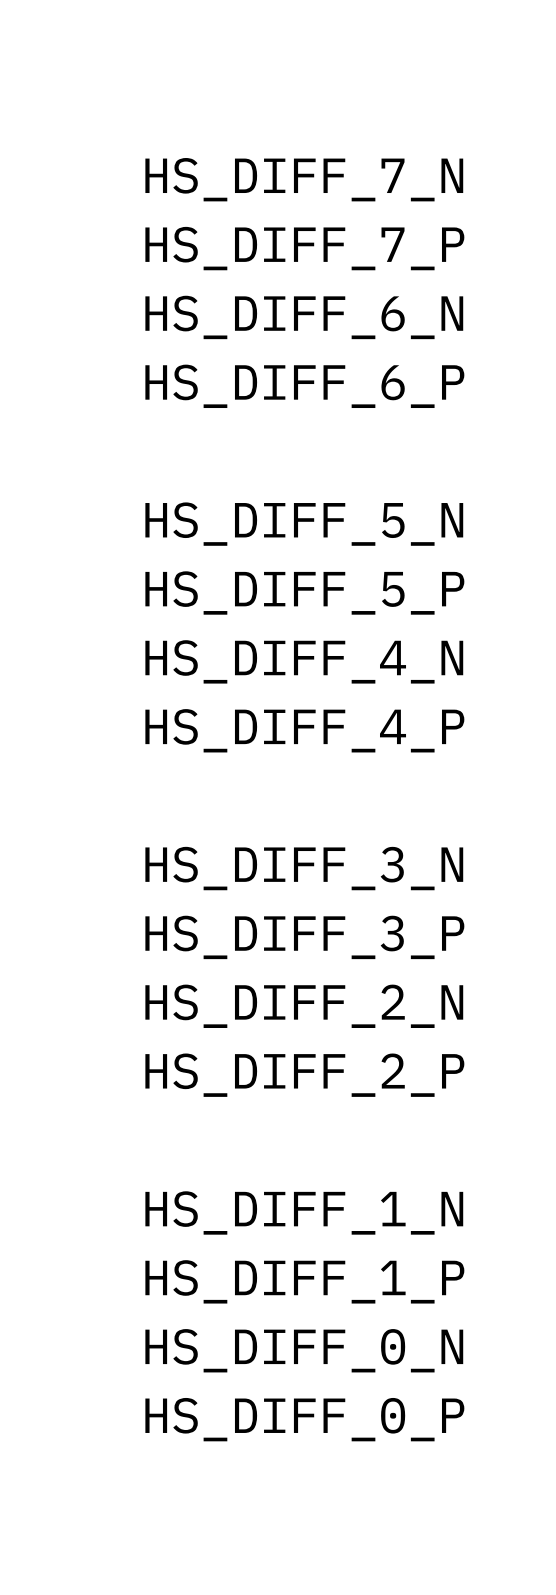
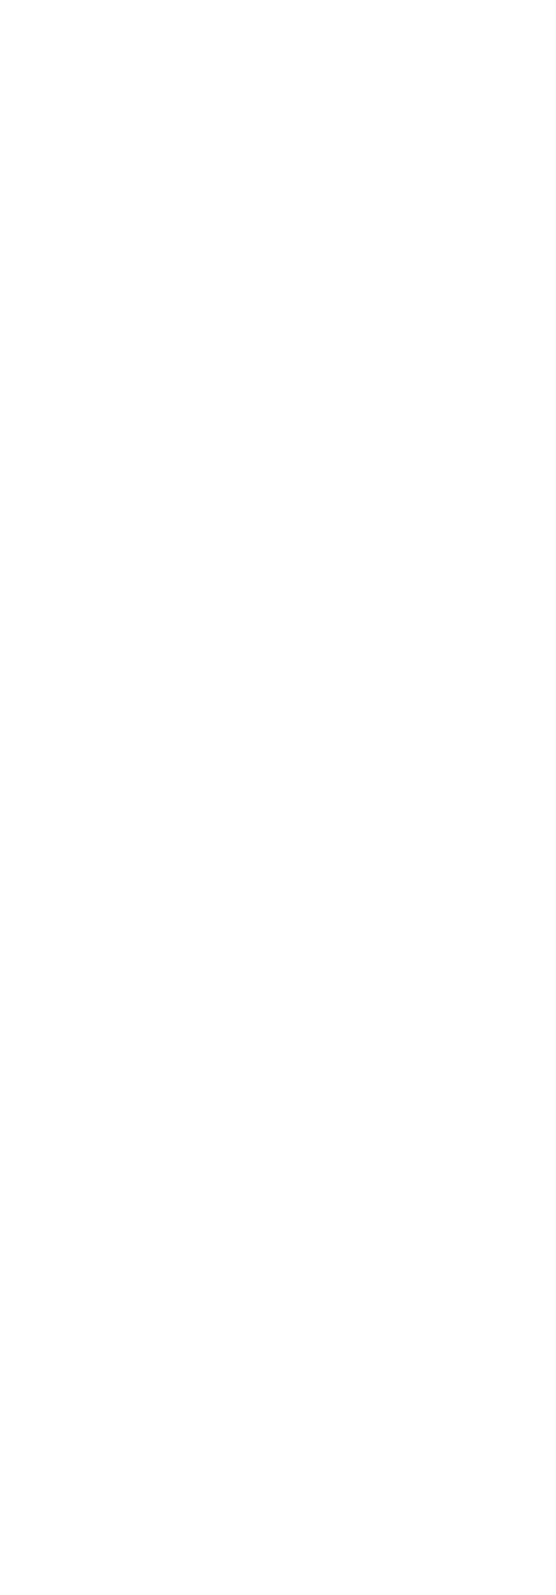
label: HS_DIFF_7_N (304, 179) -> none
label: HS_DIFF_7_P (304, 248) -> none
label: HS_DIFF_6_N (304, 317) -> none
label: HS_DIFF_6_P (304, 386) -> none
label: HS_DIFF_5_N (304, 524) -> none
label: HS_DIFF_5_P (304, 592) -> none
label: HS_DIFF_4_N (304, 661) -> none
label: HS_DIFF_4_P (304, 730) -> none
label: HS_DIFF_3_N (304, 868) -> none
label: HS_DIFF_3_P (304, 937) -> none
label: HS_DIFF_2_N (304, 1006) -> none
label: HS_DIFF_2_P (304, 1075) -> none
label: HS_DIFF_1_N (304, 1212) -> none
label: HS_DIFF_1_P (304, 1281) -> none
label: HS_DIFF_0_N (304, 1350) -> none
label: HS_DIFF_0_P (304, 1419) -> none

